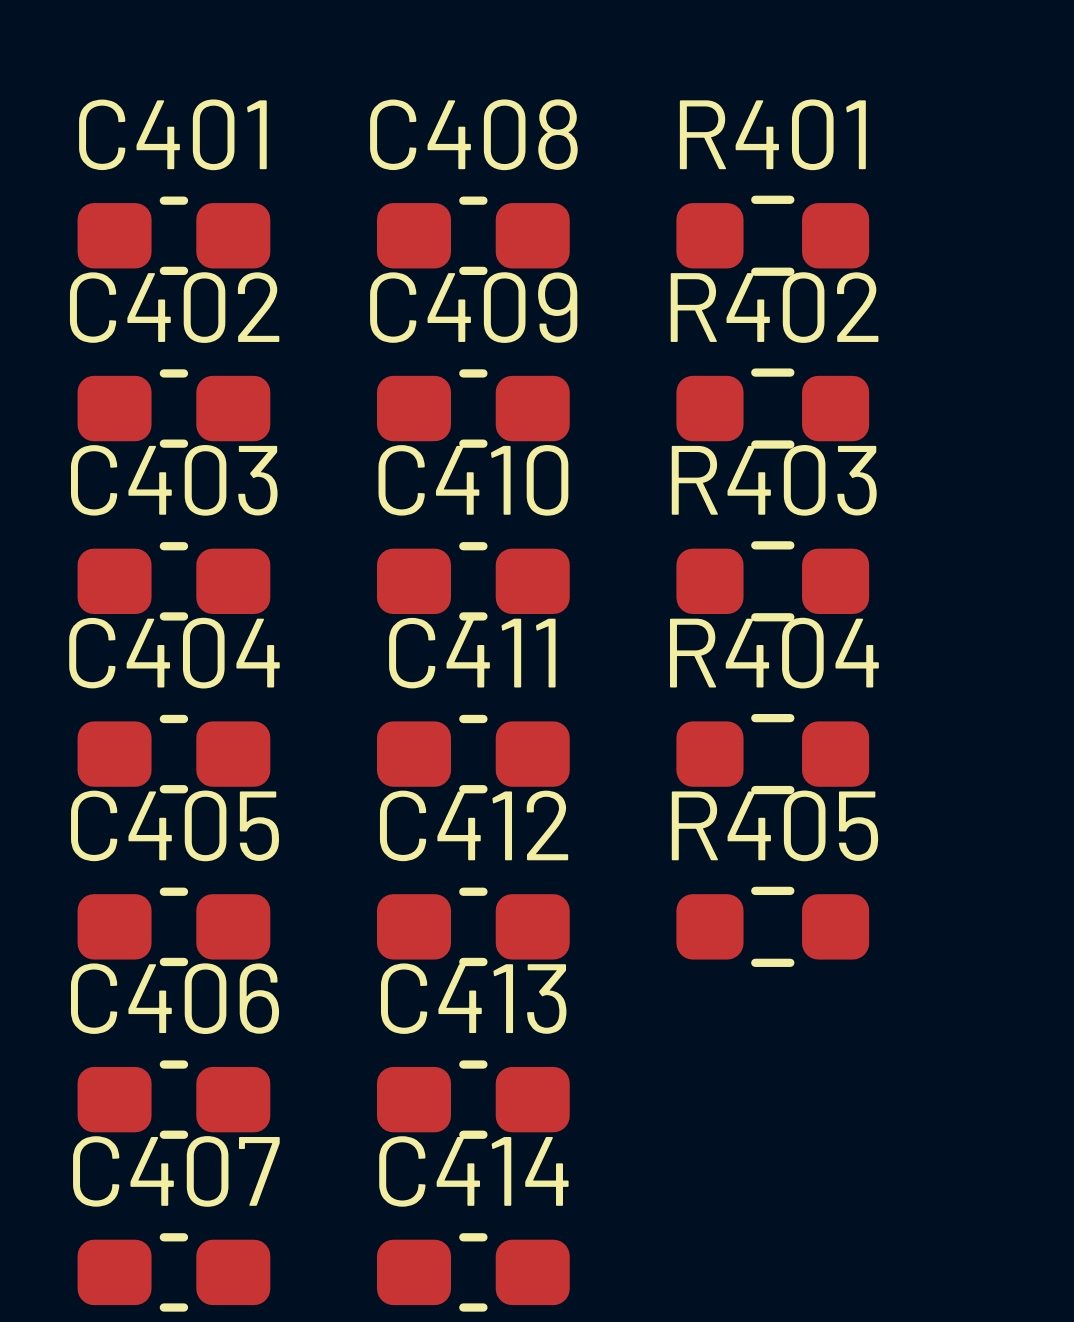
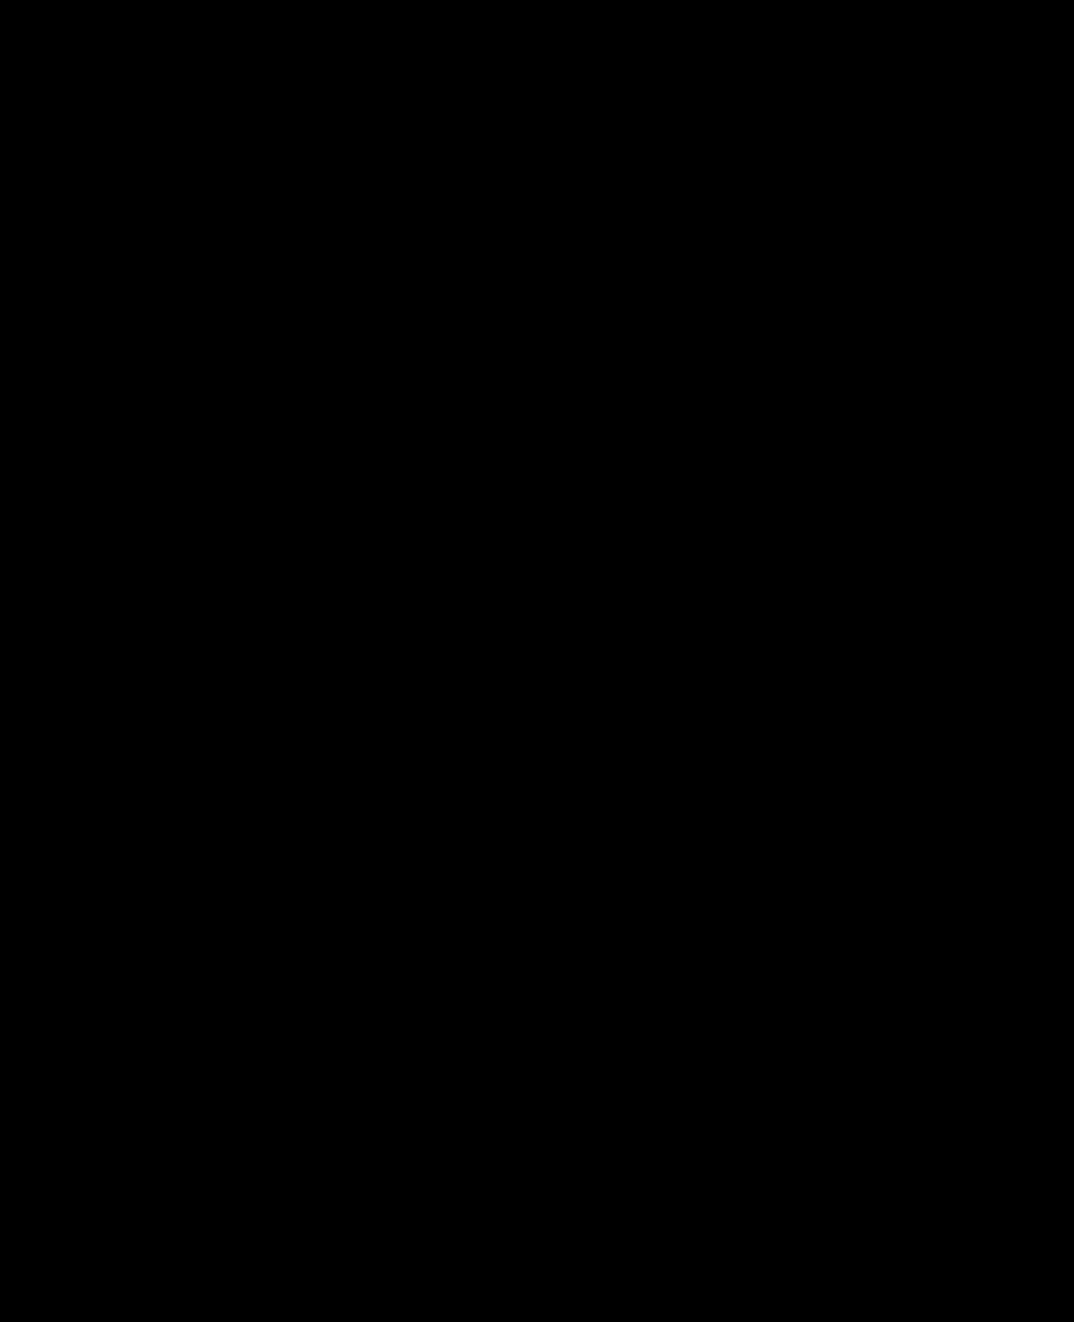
C401: (173, 235) -> none
C408: (473, 235) -> none
R401: (772, 235) -> none
C402: (173, 408) -> none
C409: (473, 408) -> none
R402: (772, 408) -> none
C403: (173, 581) -> none
C410: (473, 581) -> none
R403: (772, 581) -> none
C404: (173, 754) -> none
C411: (473, 754) -> none
R404: (772, 754) -> none
C405: (173, 926) -> none
C412: (473, 926) -> none
R405: (772, 926) -> none
C406: (173, 1099) -> none
C413: (473, 1099) -> none
C407: (173, 1272) -> none
C414: (473, 1272) -> none

